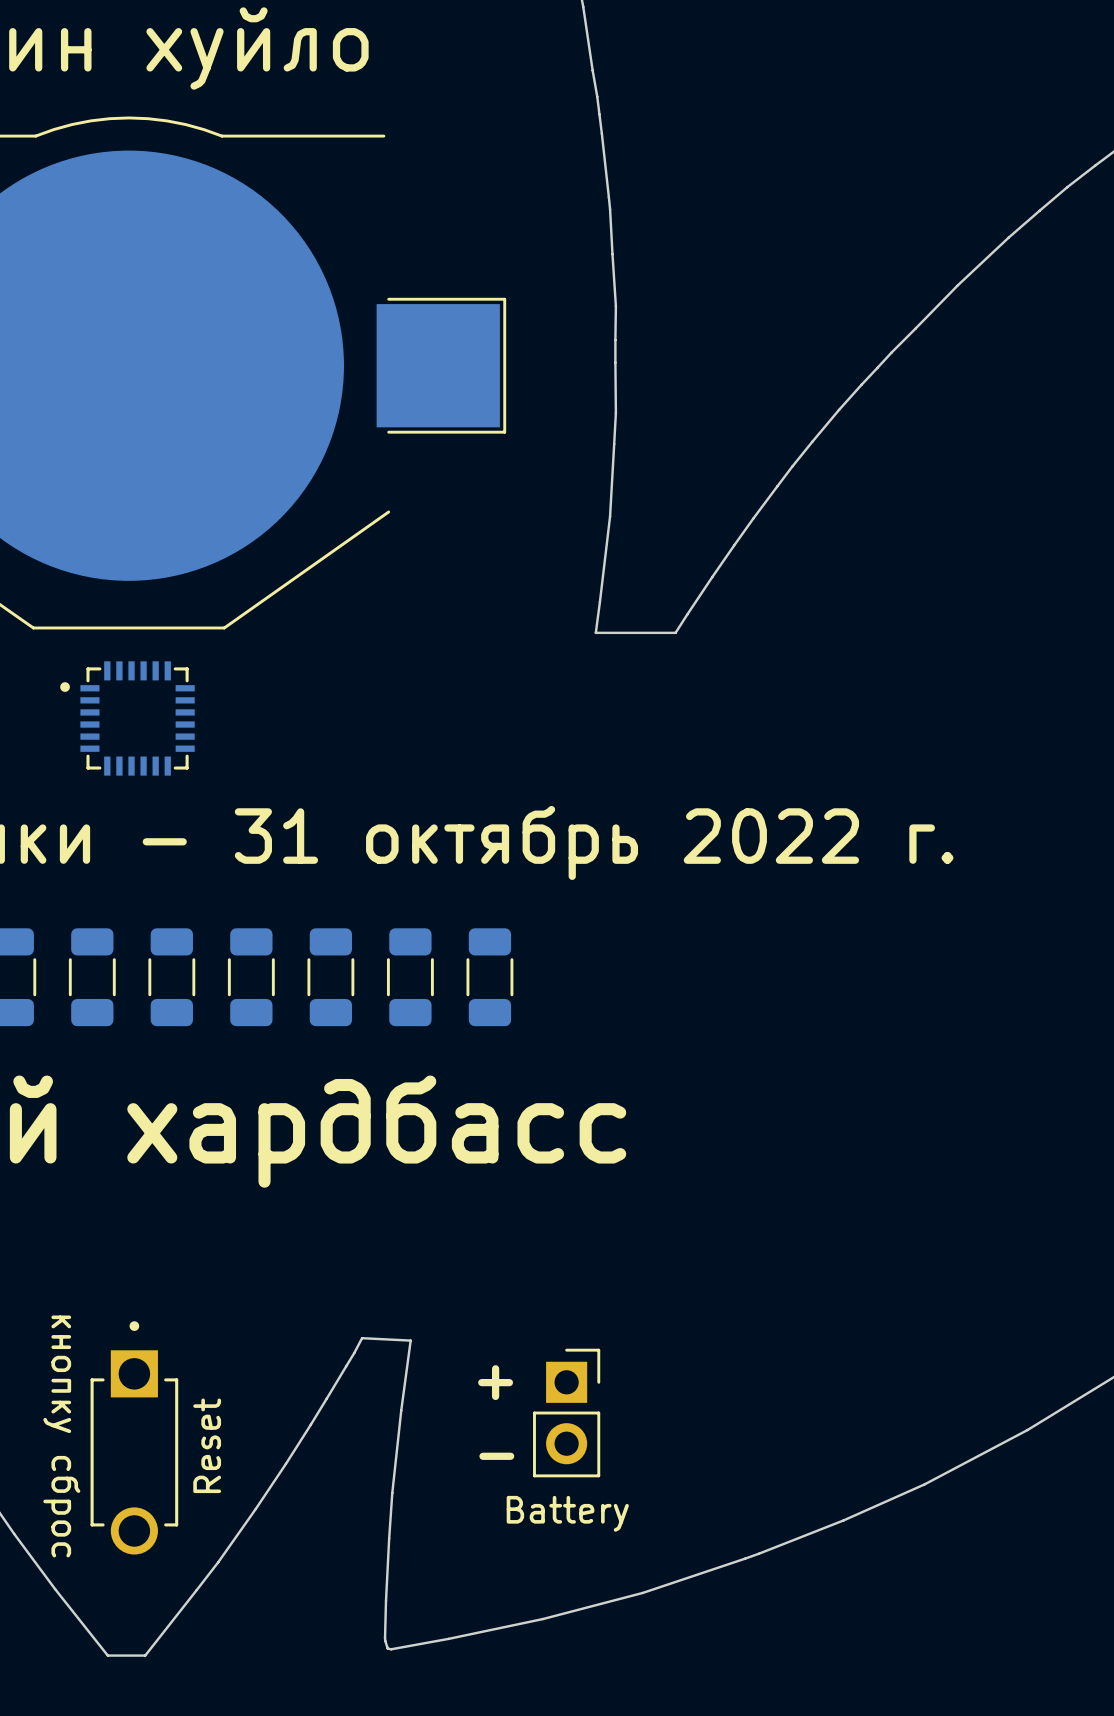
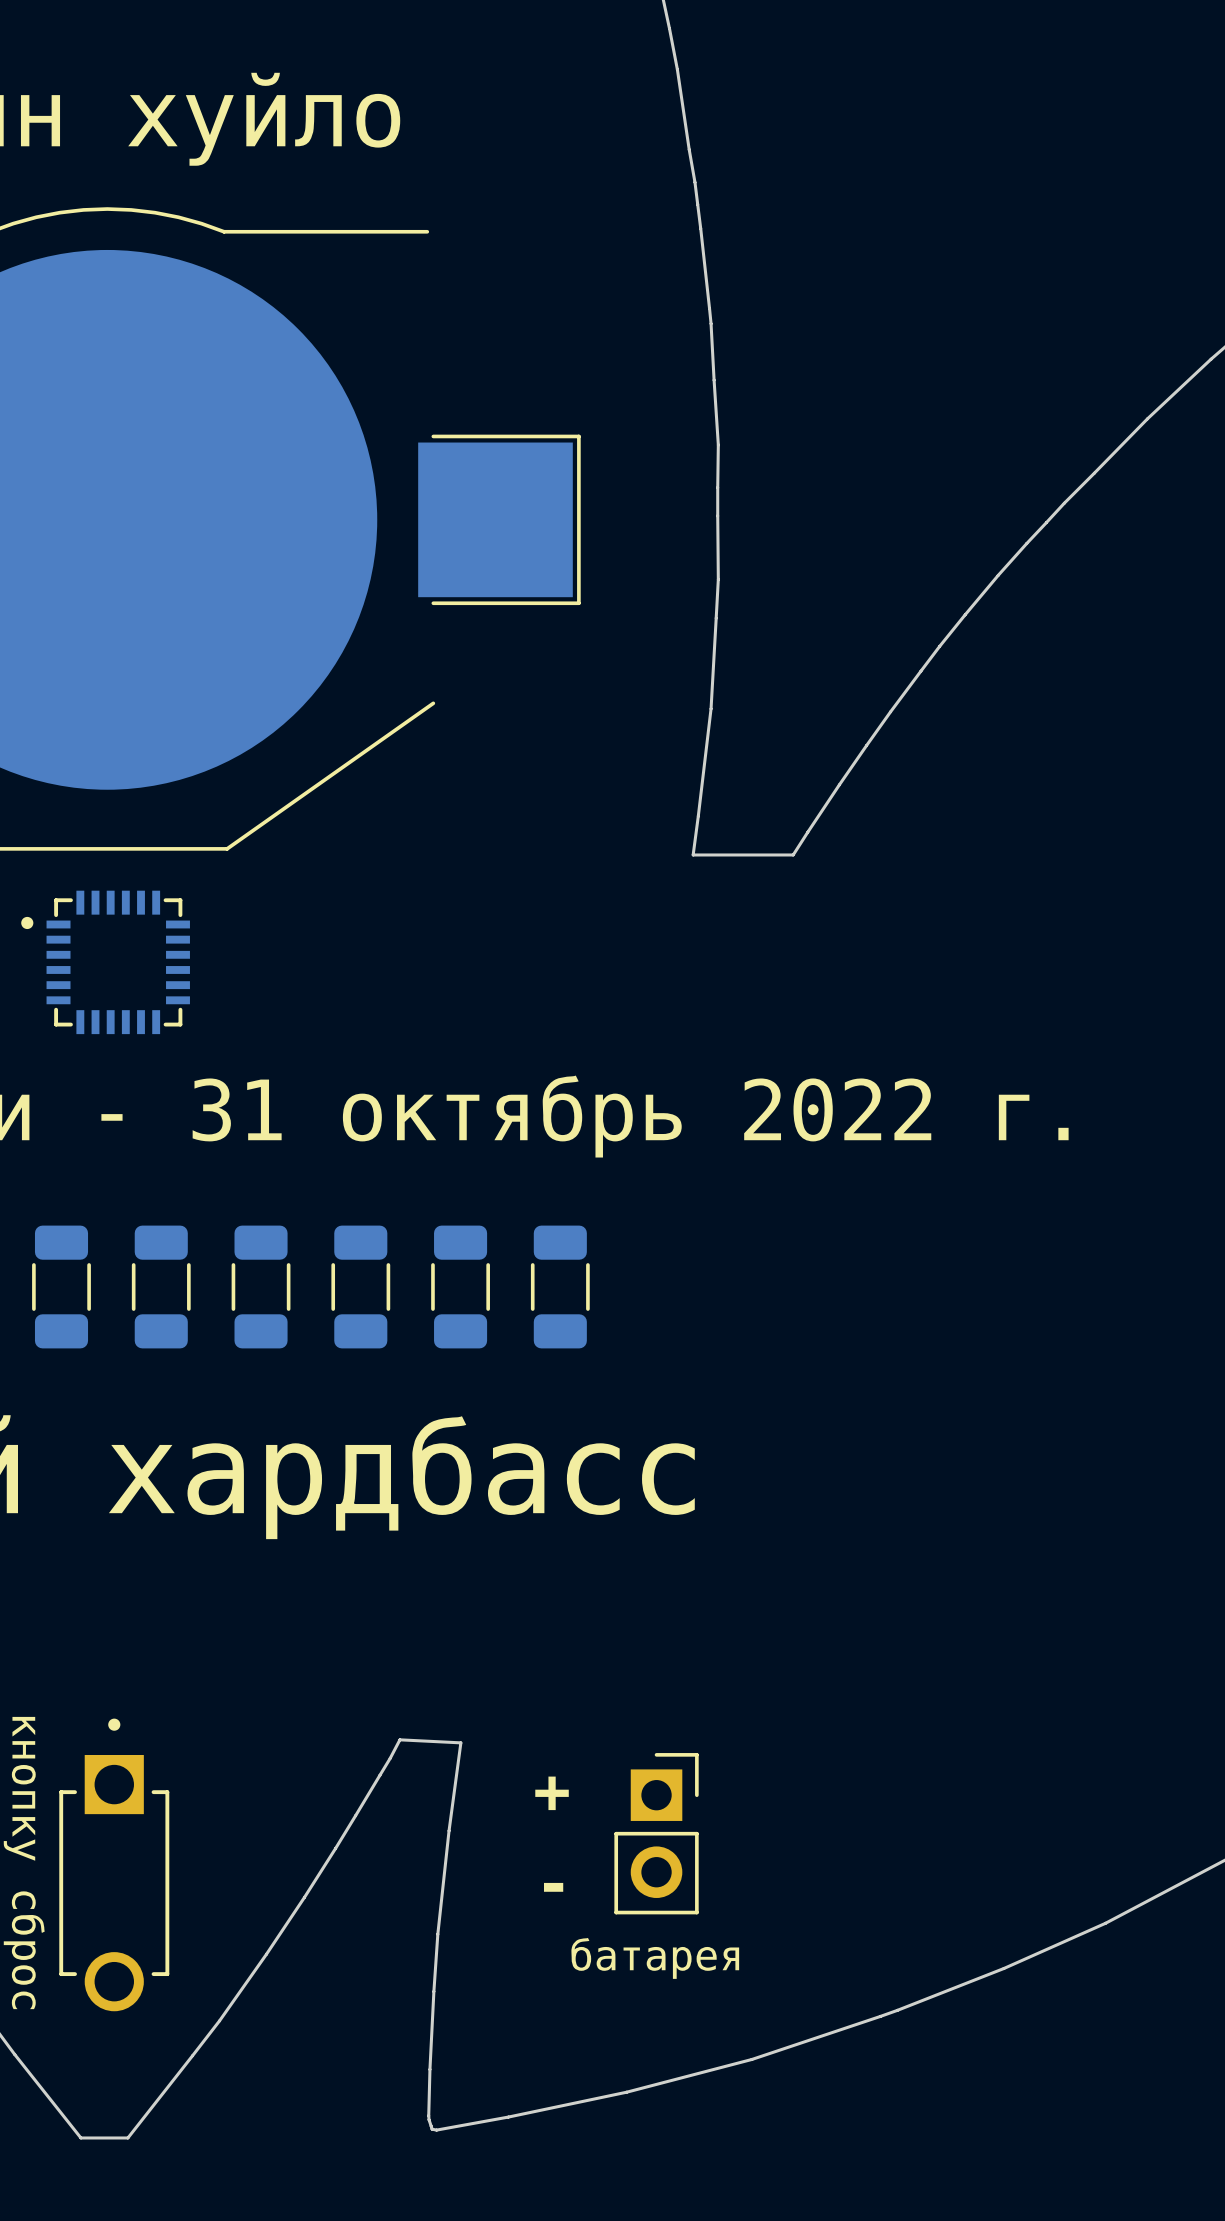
part text: Reset (207, 1445) -> none
part value: Battery (567, 1513) -> батарея (655, 1958)

